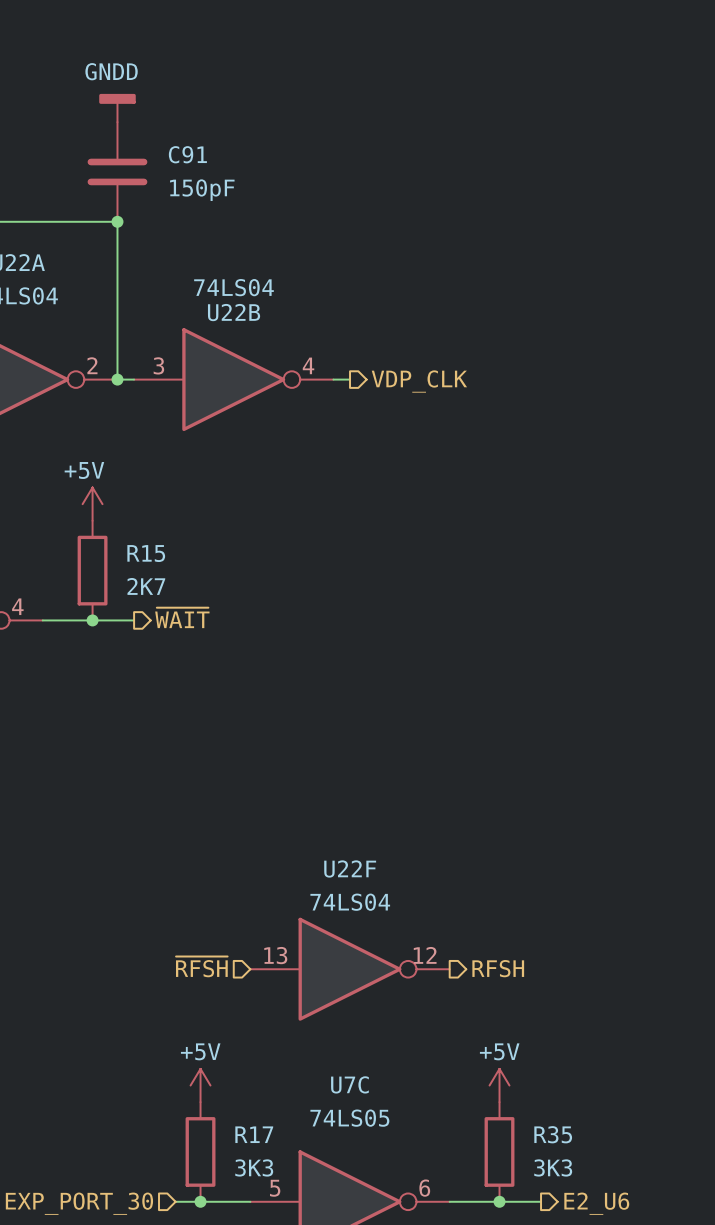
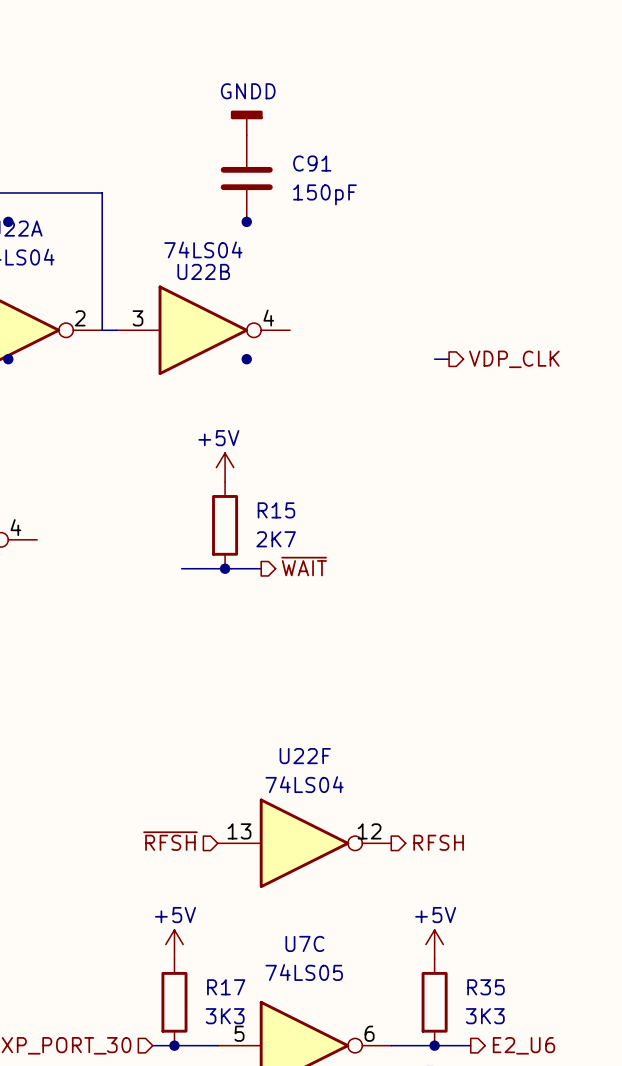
power symbol position: GNDD (117, 108) -> GNDD (246, 122)
C91 position: (117, 171) -> (246, 178)
junction: (117, 221) -> none
junction: none -> (8, 221)
junction: none -> (246, 221)
junction: (117, 379) -> none
wire: (333, 379) (350, 379) -> (434, 359) (449, 359)
hierarchical label position: VDP_CLK (419, 381) -> VDP_CLK (514, 359)
junction: none -> (8, 359)
junction: none -> (246, 359)
power symbol position: +5V (92, 504) -> +5V (225, 467)
R15 position: (92, 570) -> (225, 525)
hierarchical label position: ~{WAIT} (182, 617) -> ~{WAIT} (304, 566)
wire: (42, 620) (134, 620) -> (181, 568) (261, 568)
junction: (92, 620) -> none
junction: none -> (225, 568)

